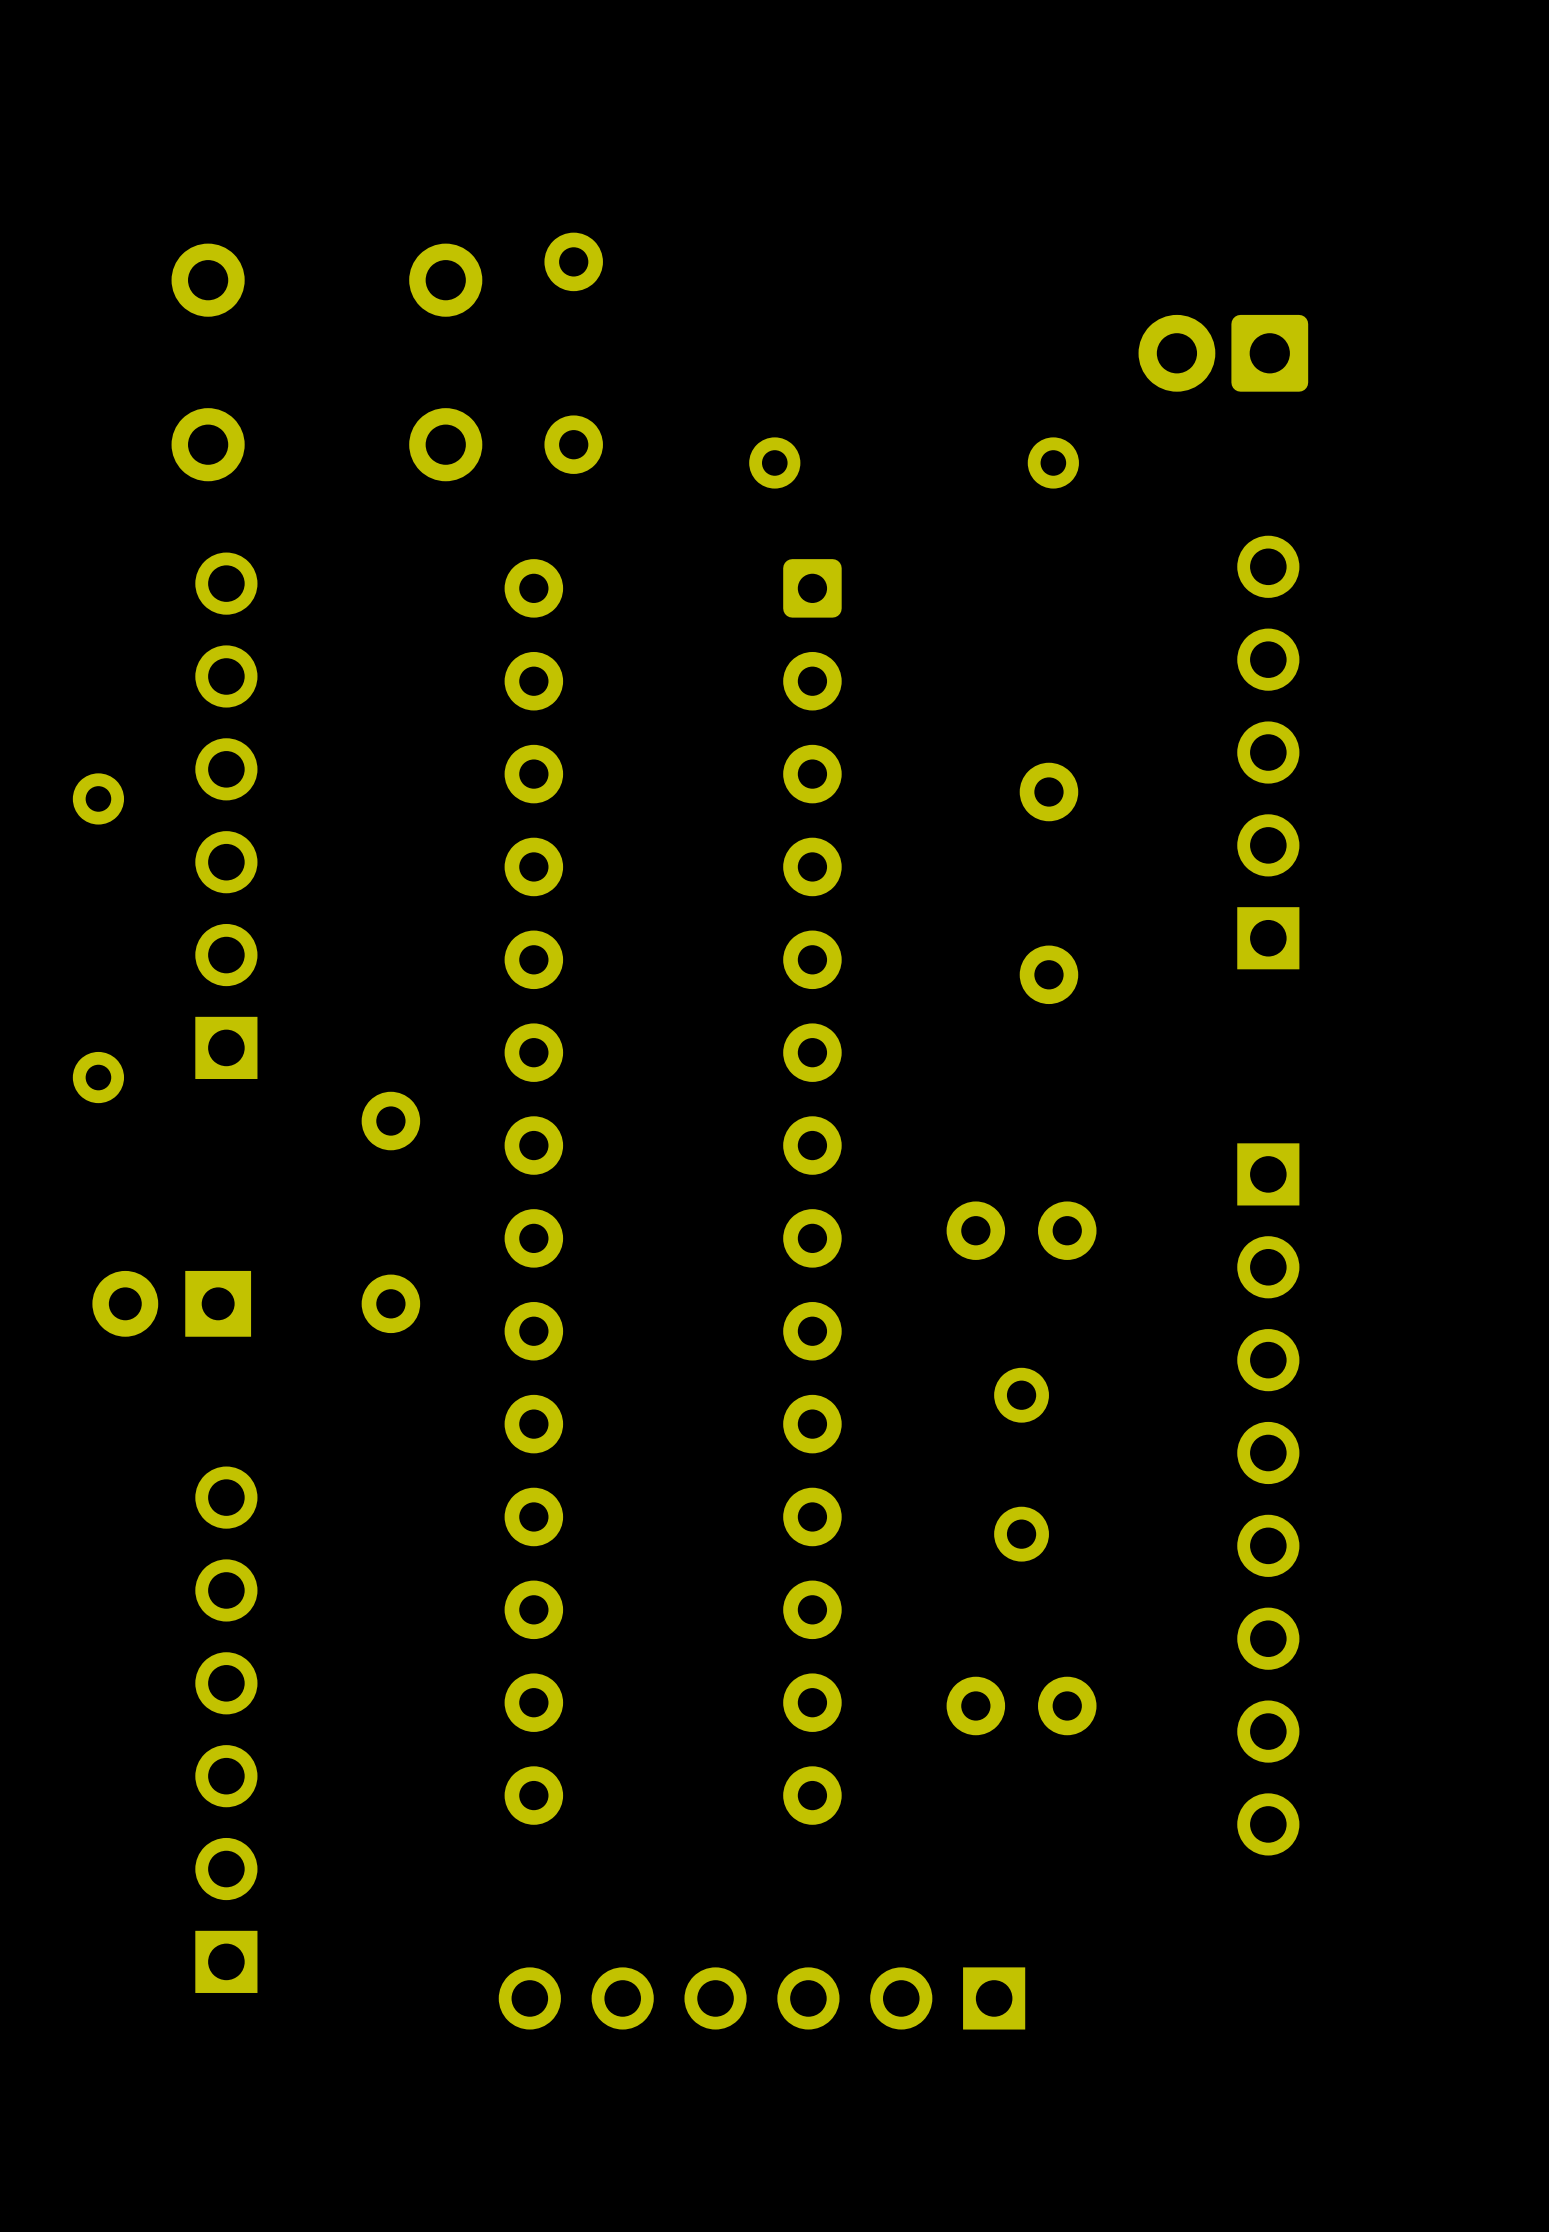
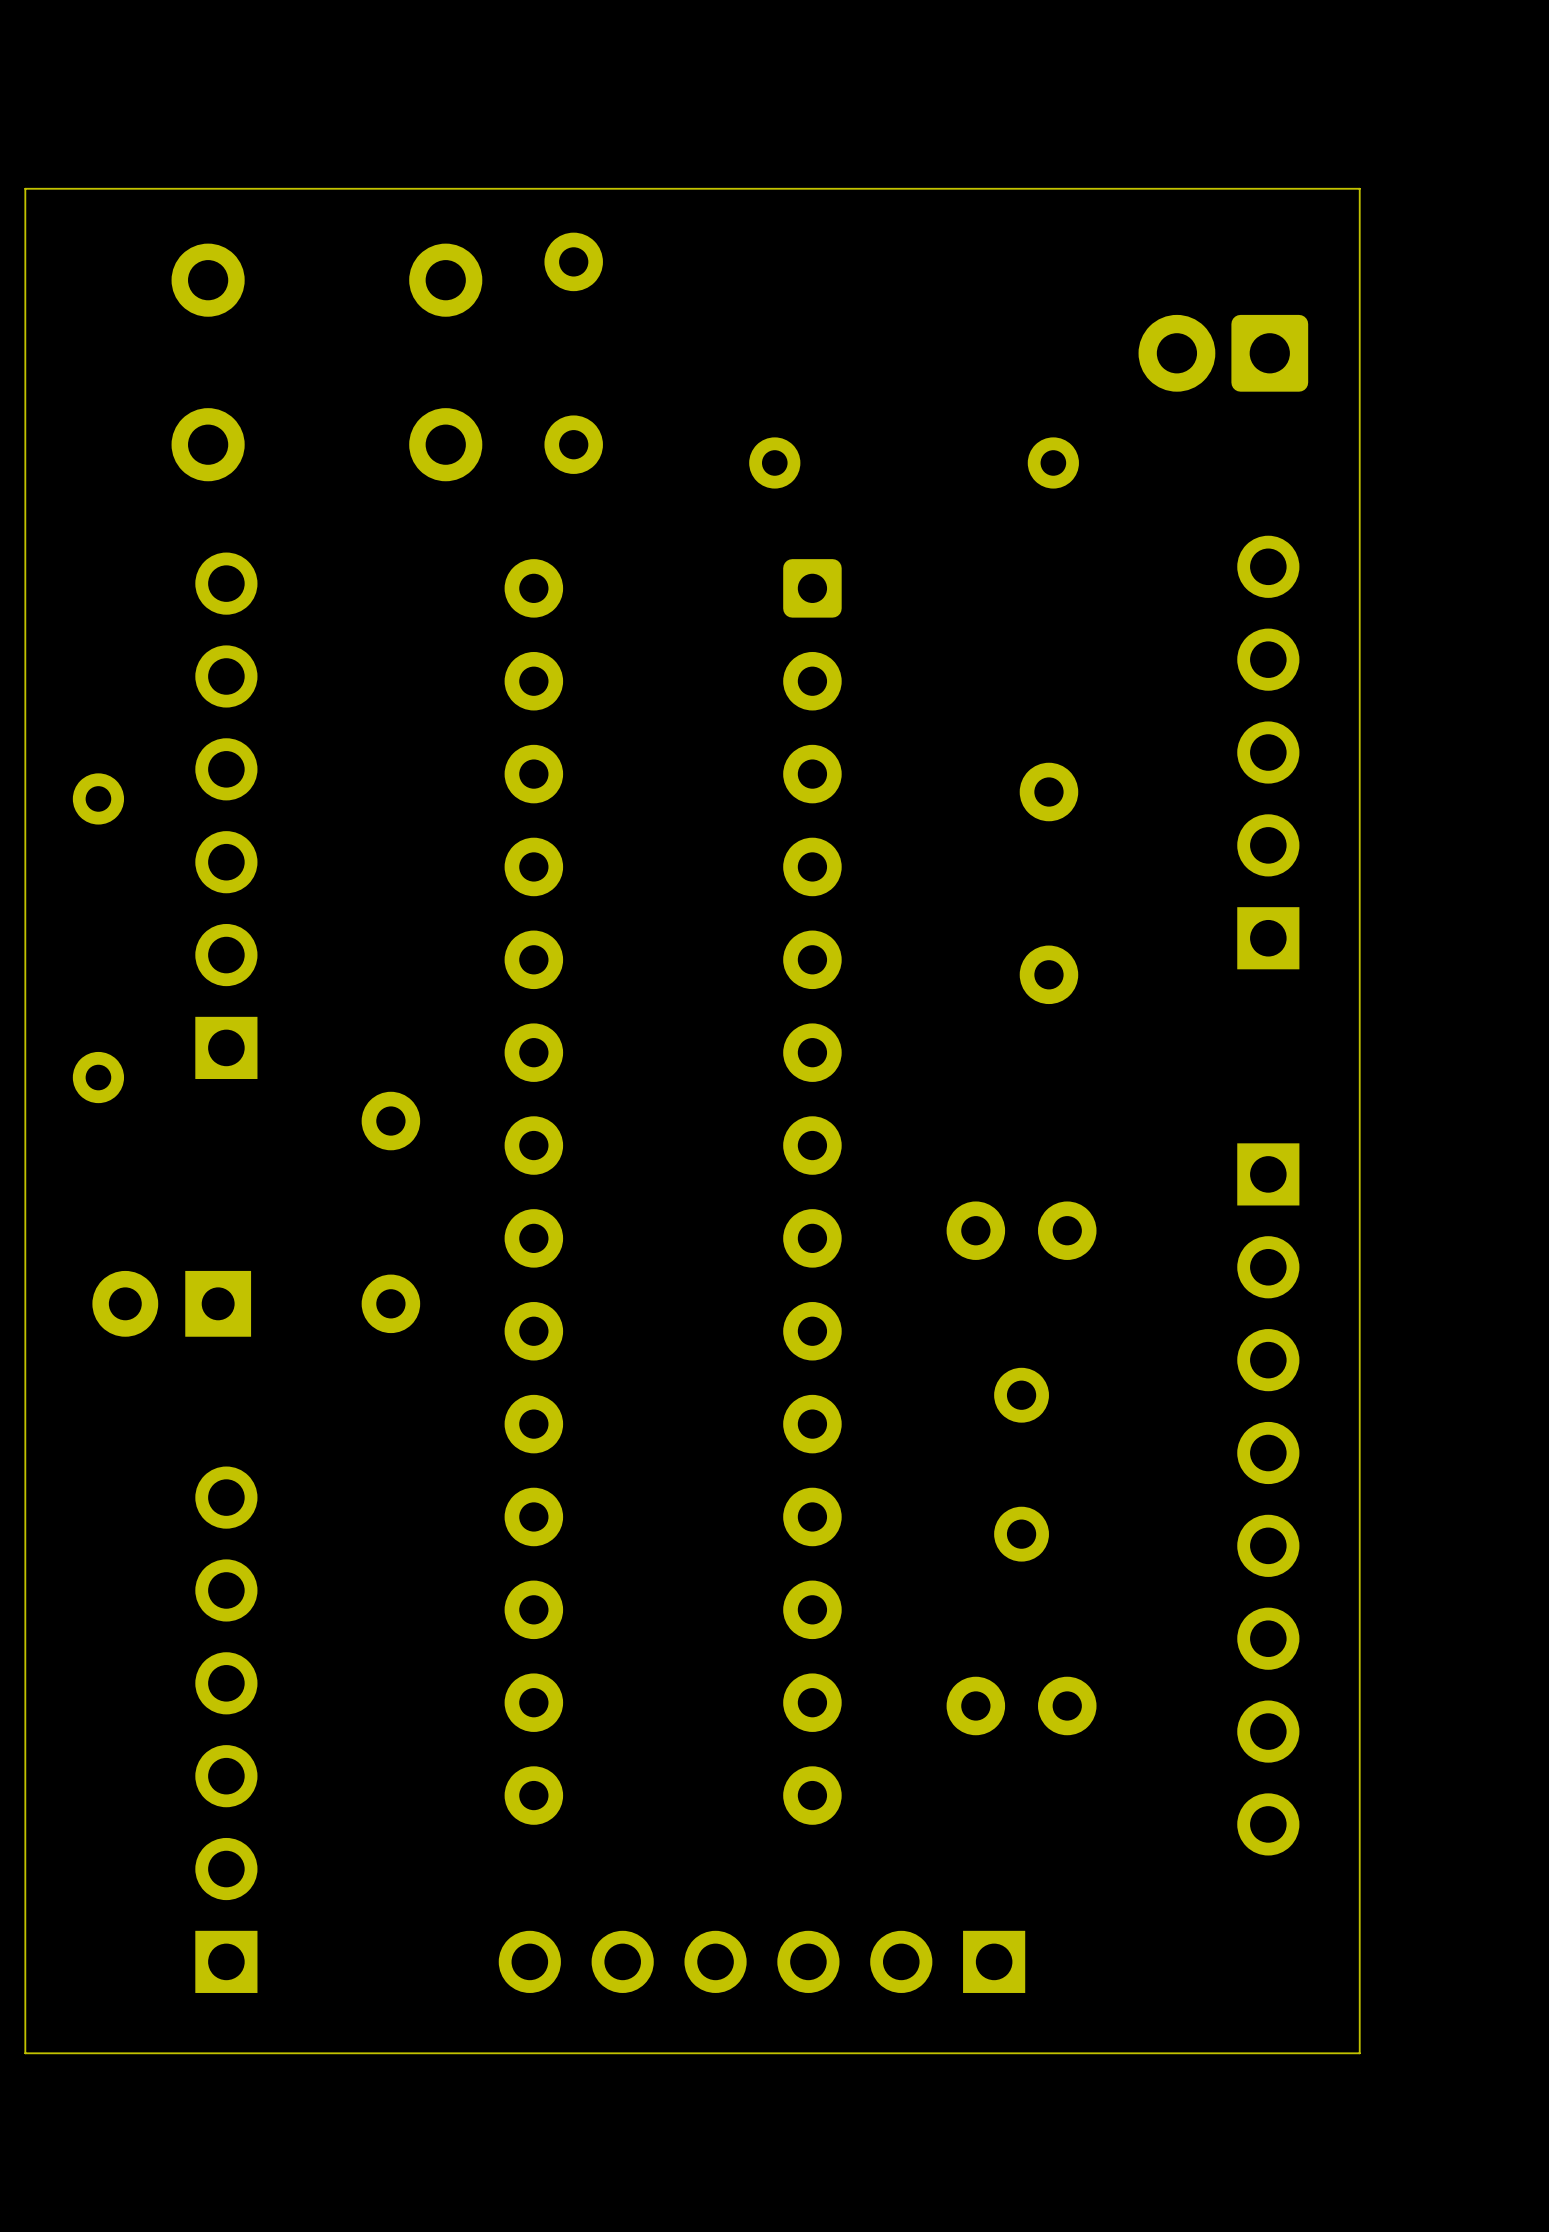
board edge: none -> (1359, 188) (25, 188) (25, 2053) (1359, 2053) (1359, 188)
part position: (761, 1998) -> (761, 1961)

